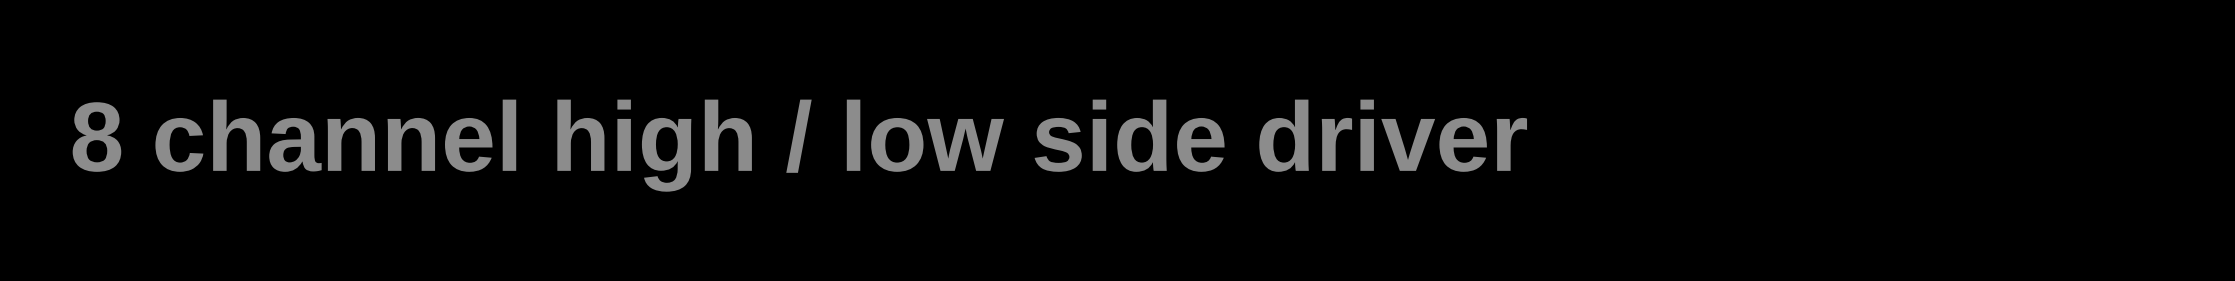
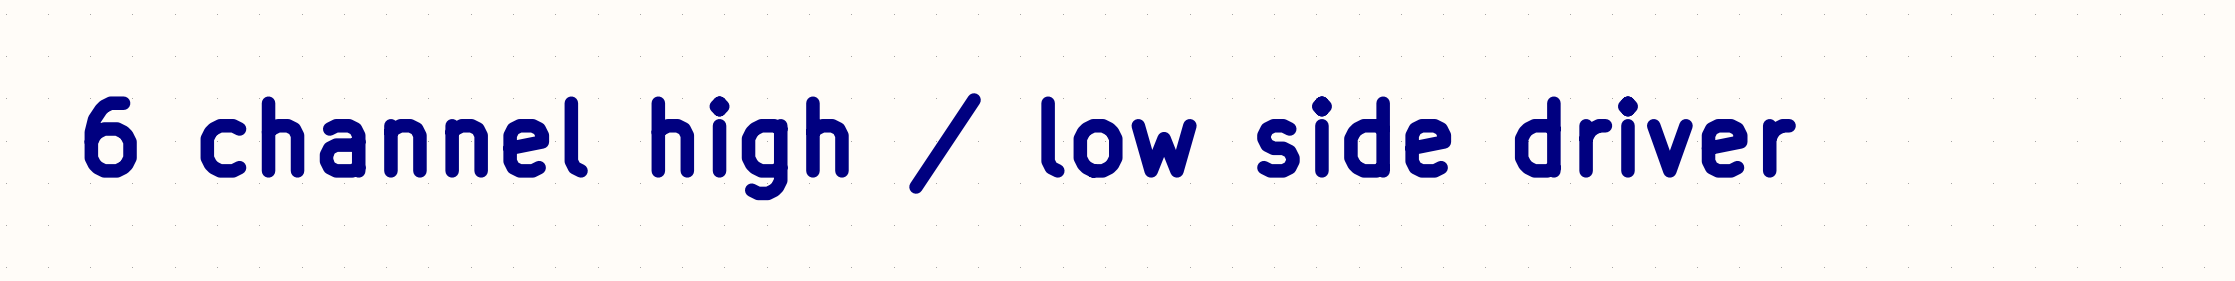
text: 8 channel high / low side driver (799, 145) -> 6 channel high / low side driver (940, 146)

